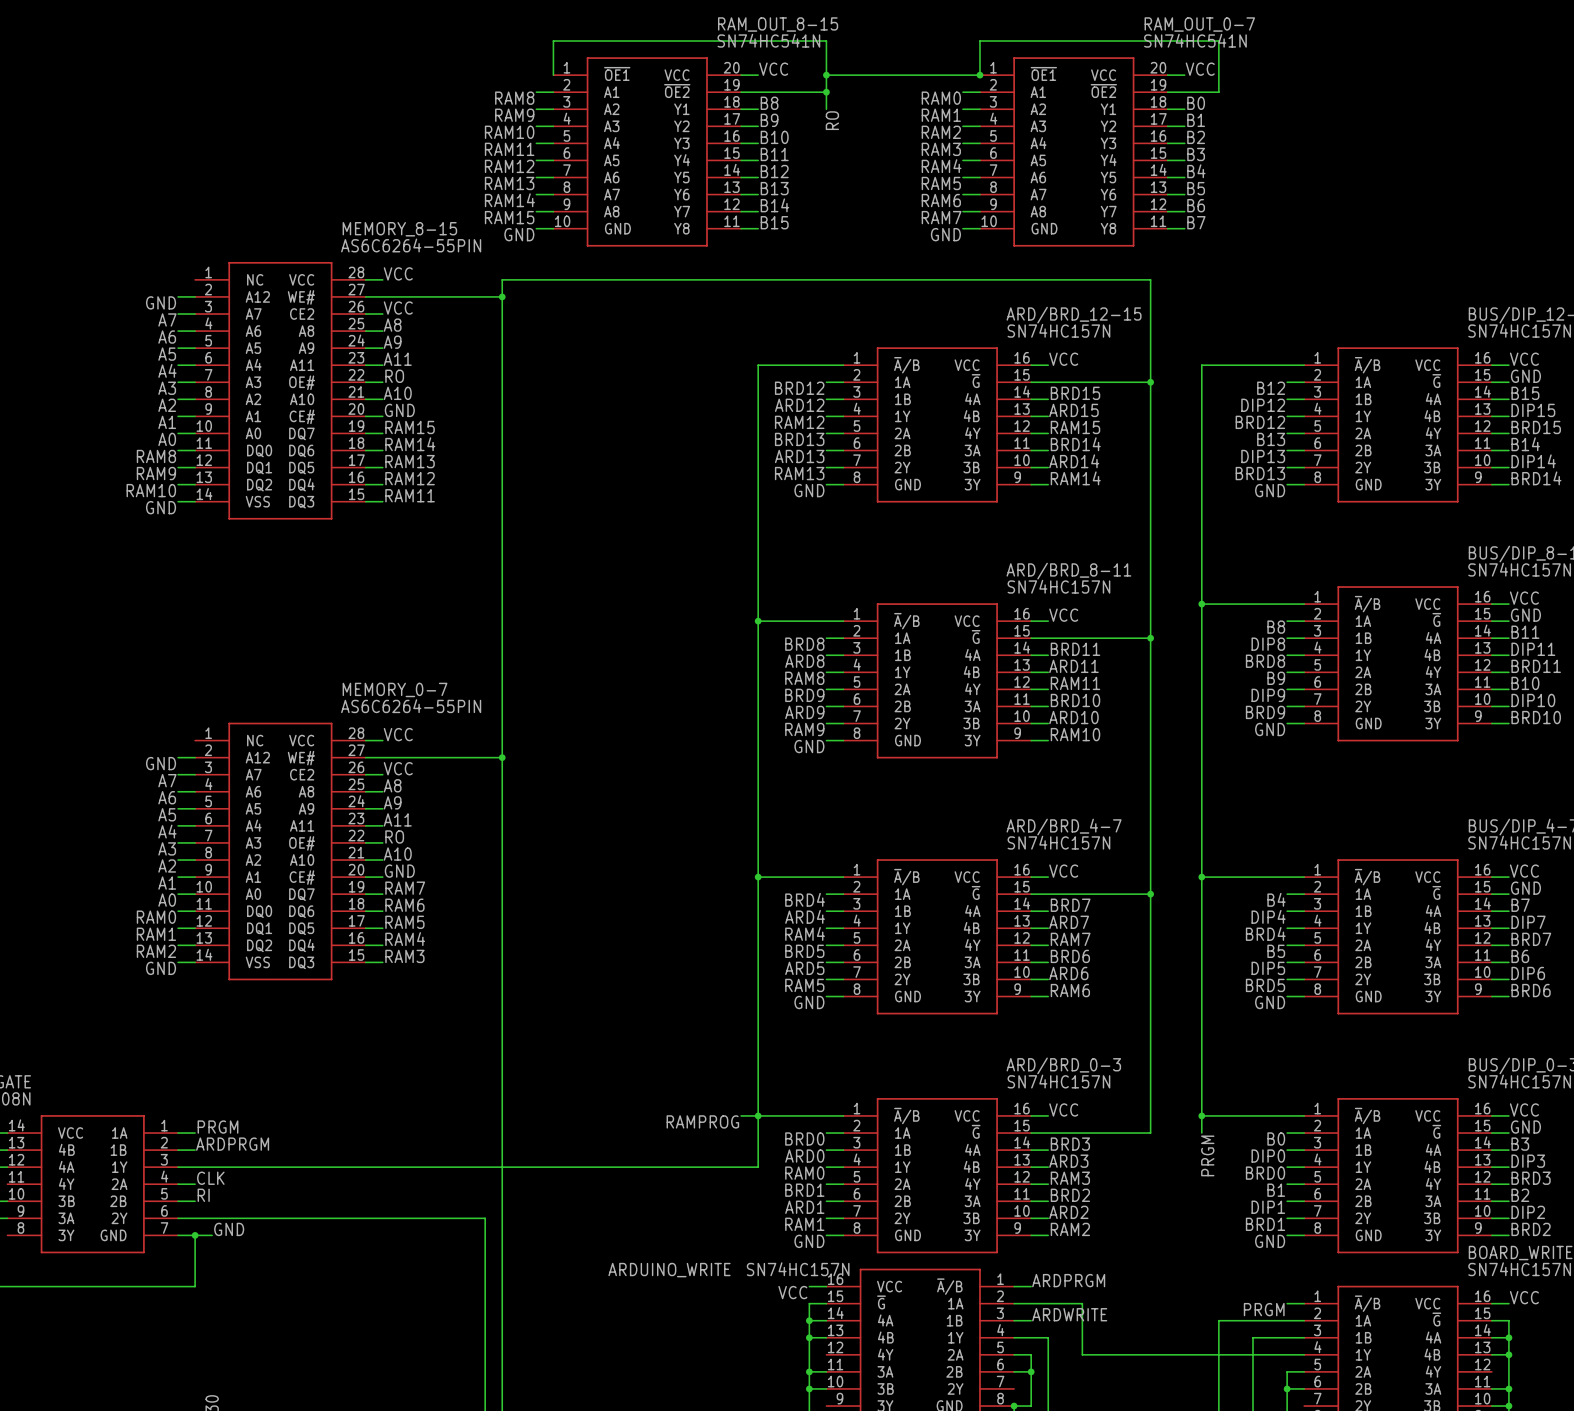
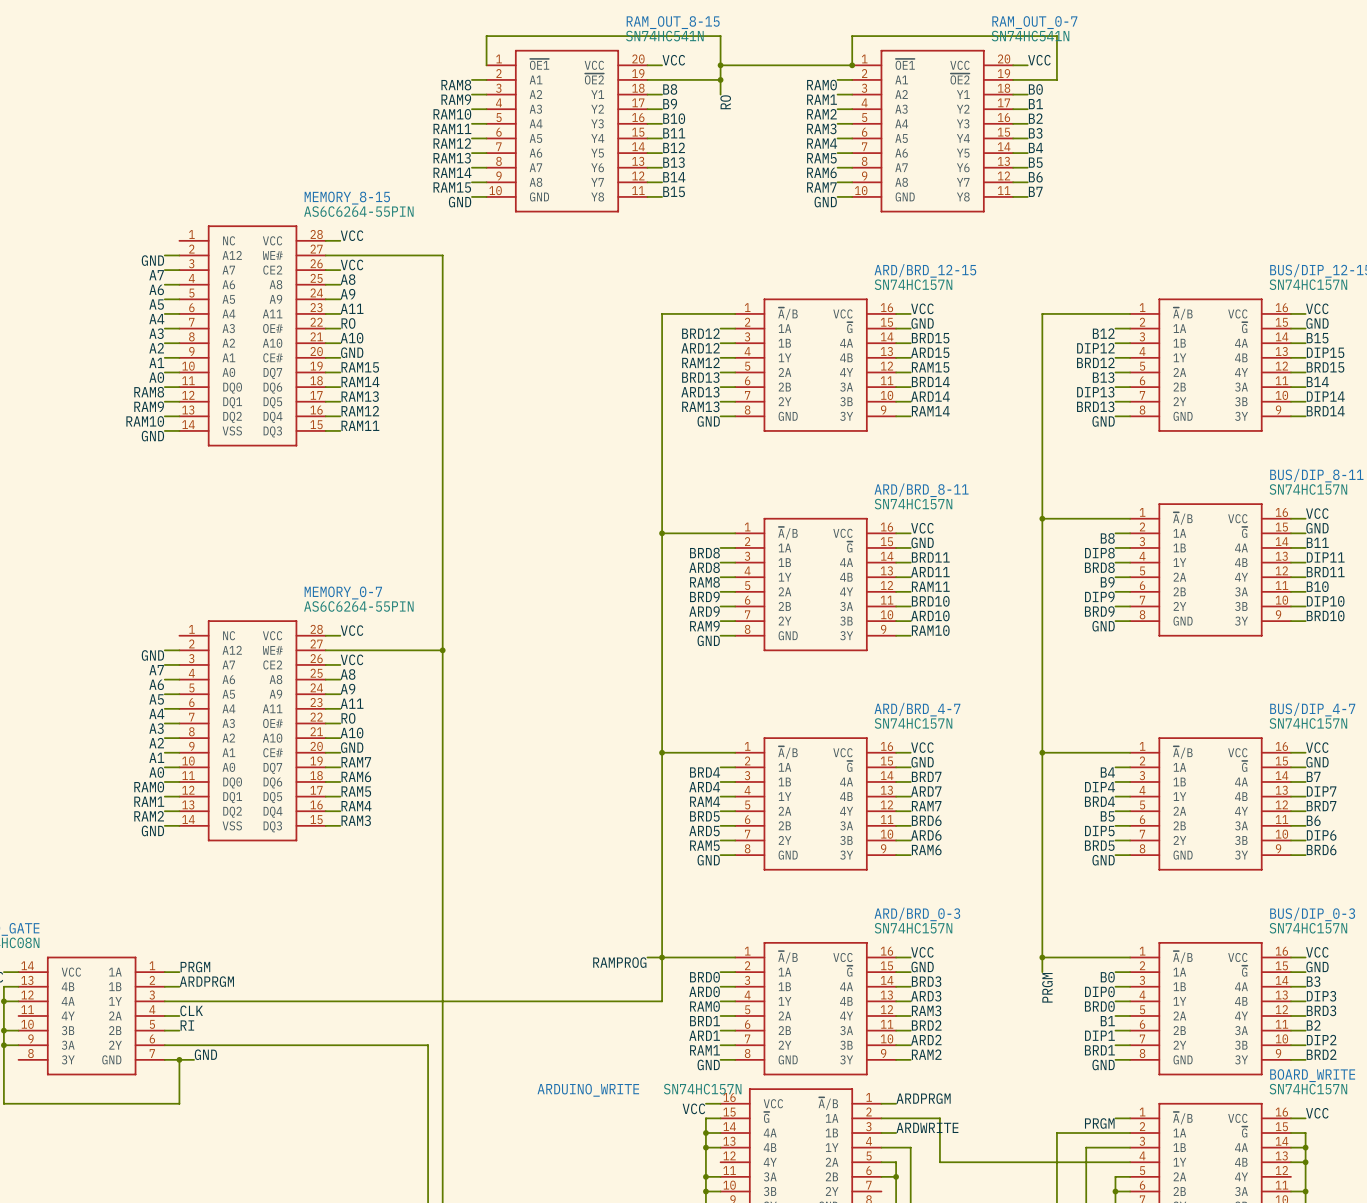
wire: (502, 296) (502, 279) (1150, 279) (1150, 1133) (1048, 1133) -> none
junction: (502, 296) -> none
label: none -> GND (922, 323)
wire: (1048, 382) (1150, 382) -> none
junction: (1150, 382) -> none
label: none -> GND (922, 542)
wire: (1048, 638) (1150, 638) -> none
junction: (1150, 638) -> none
label: none -> GND (922, 762)
wire: (1048, 894) (1150, 894) -> none
junction: (1150, 894) -> none
label: none -> GND (922, 967)

